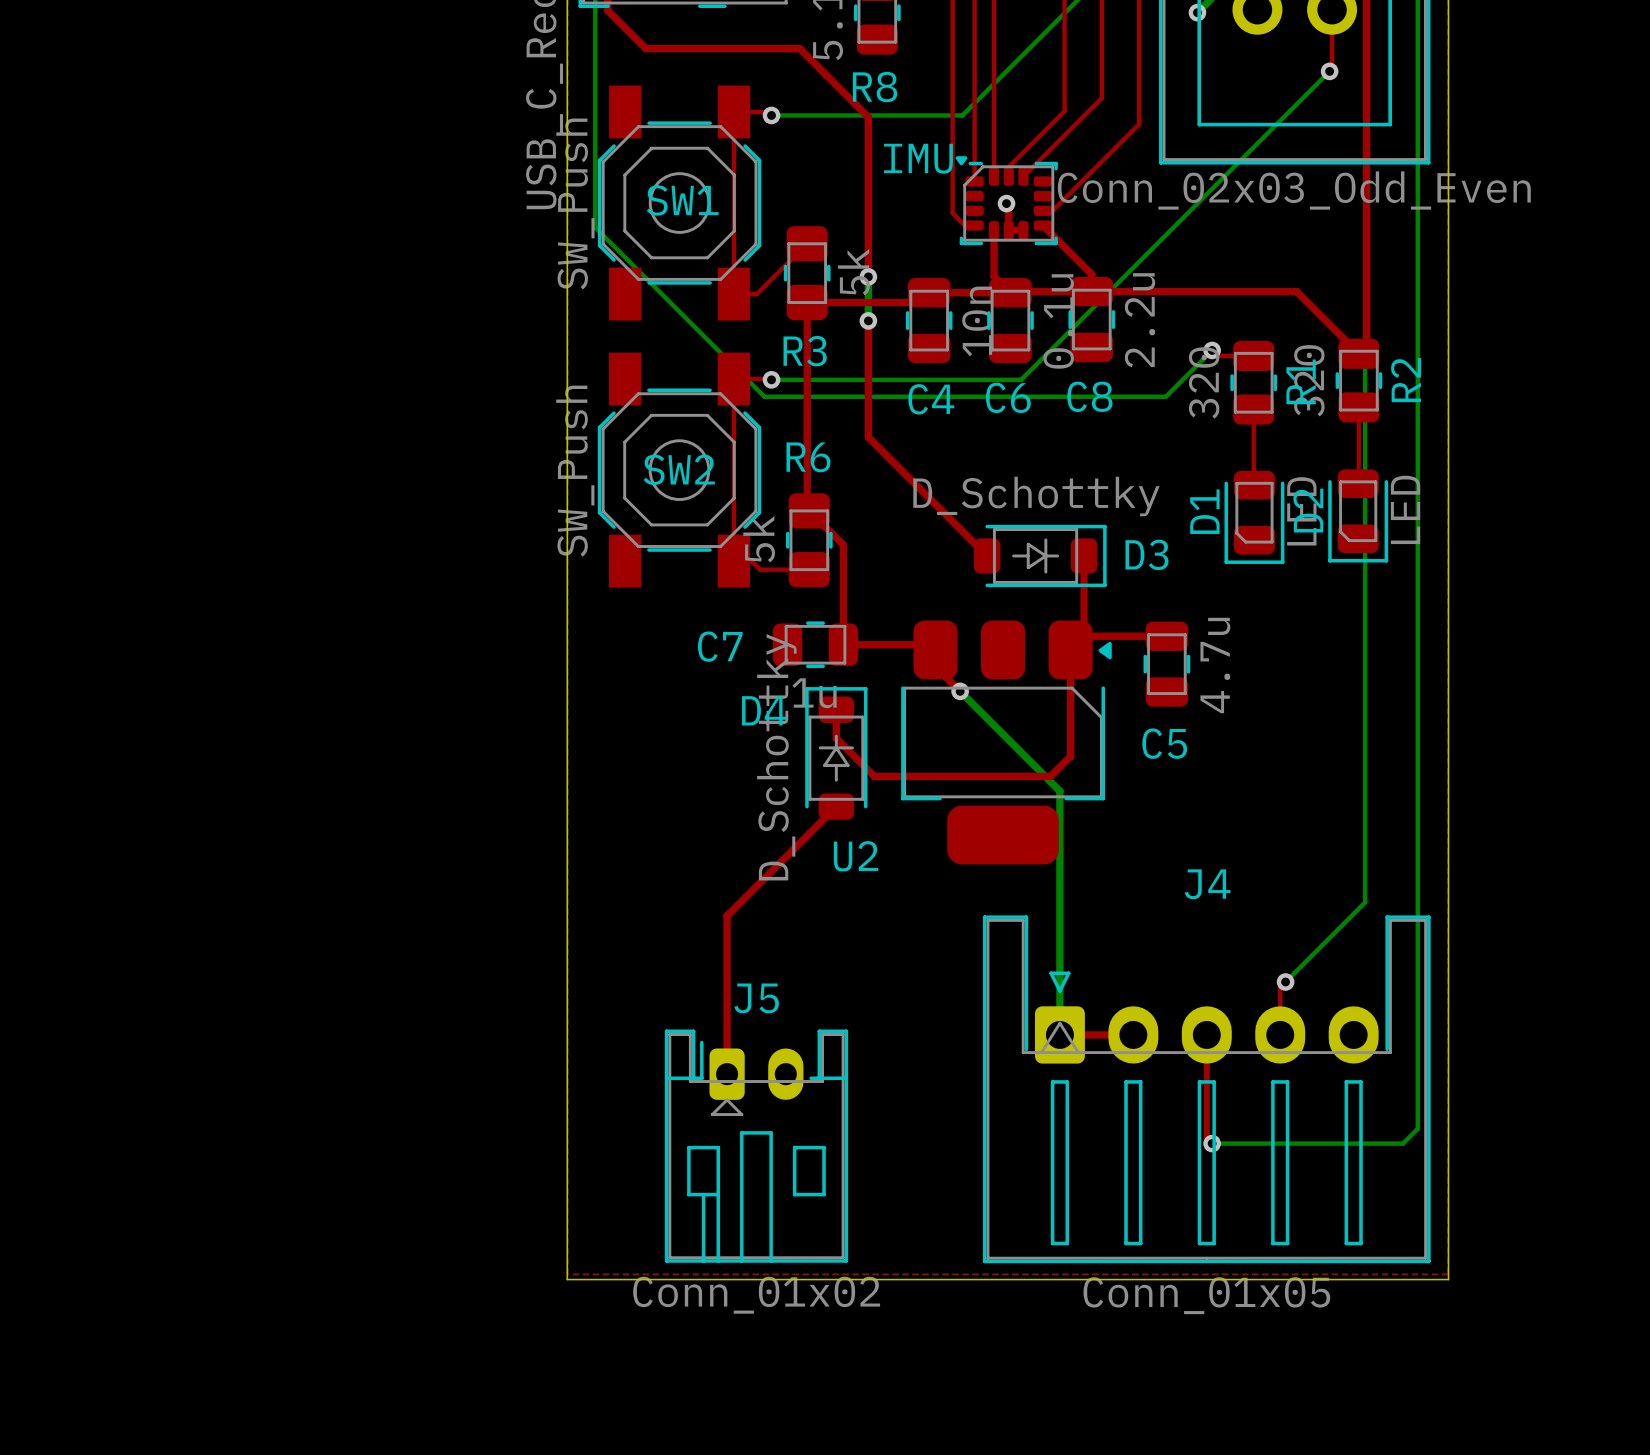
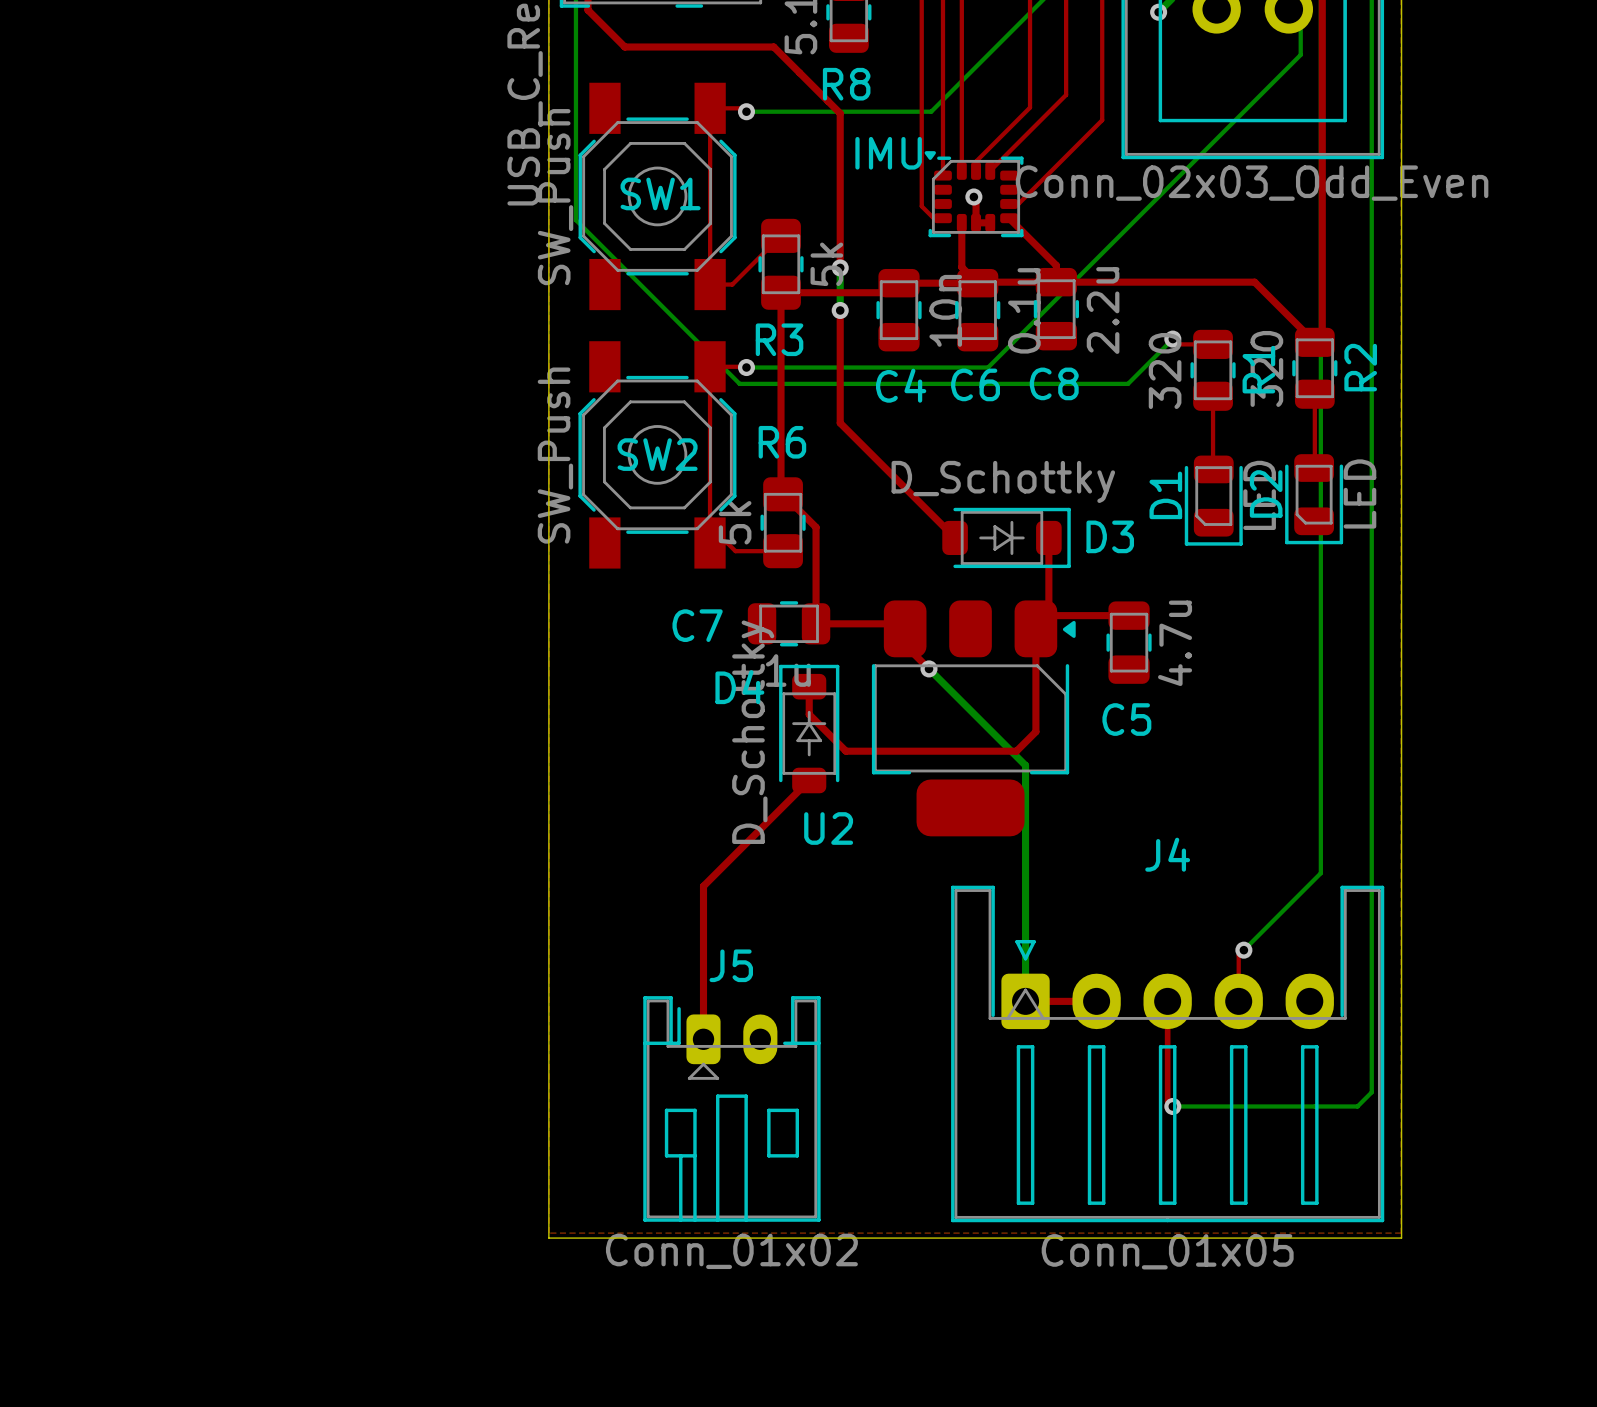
top track: (1332, 9) (1332, 68) (1329, 71) -> none
bottom track: none -> (1288, 9) (1300, 21) (1300, 54) (1286, 69)
via: (1329, 71) -> none

